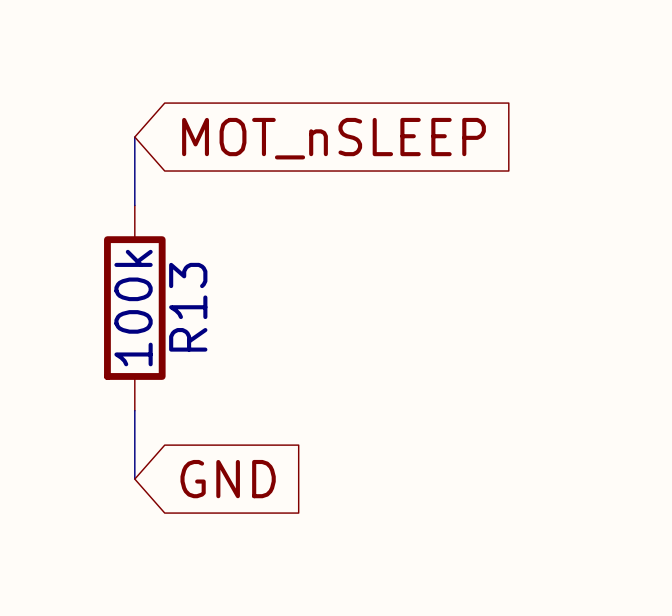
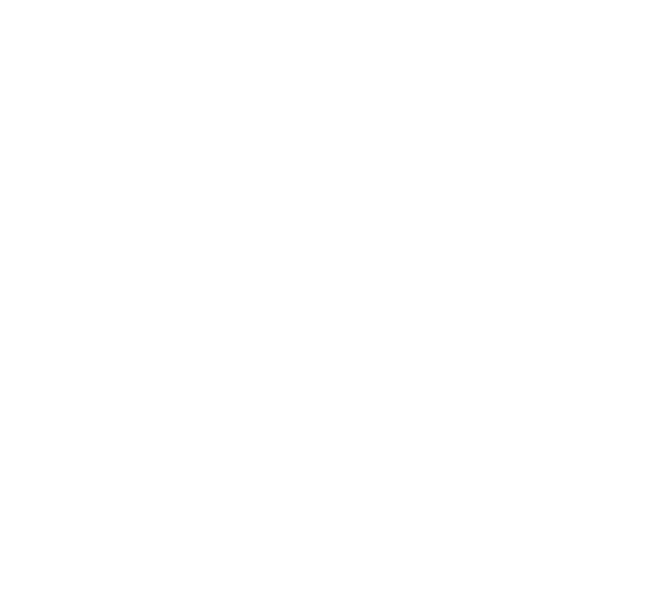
wire: (134, 137) (134, 205) -> none
global label: MOT_nSLEEP (333, 138) -> none
R13: 100k (134, 308) -> none
wire: (134, 410) (134, 479) -> none
global label: GND (228, 479) -> none

